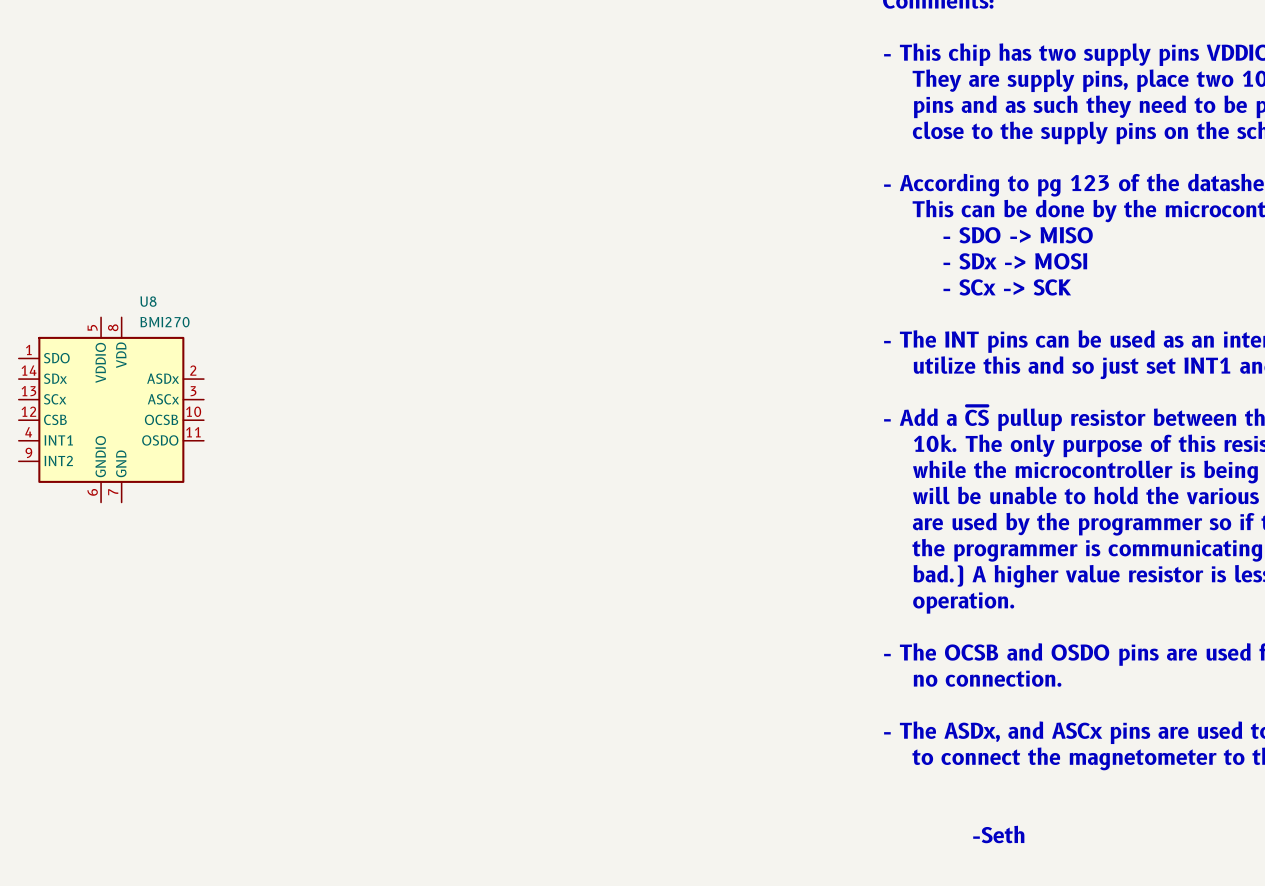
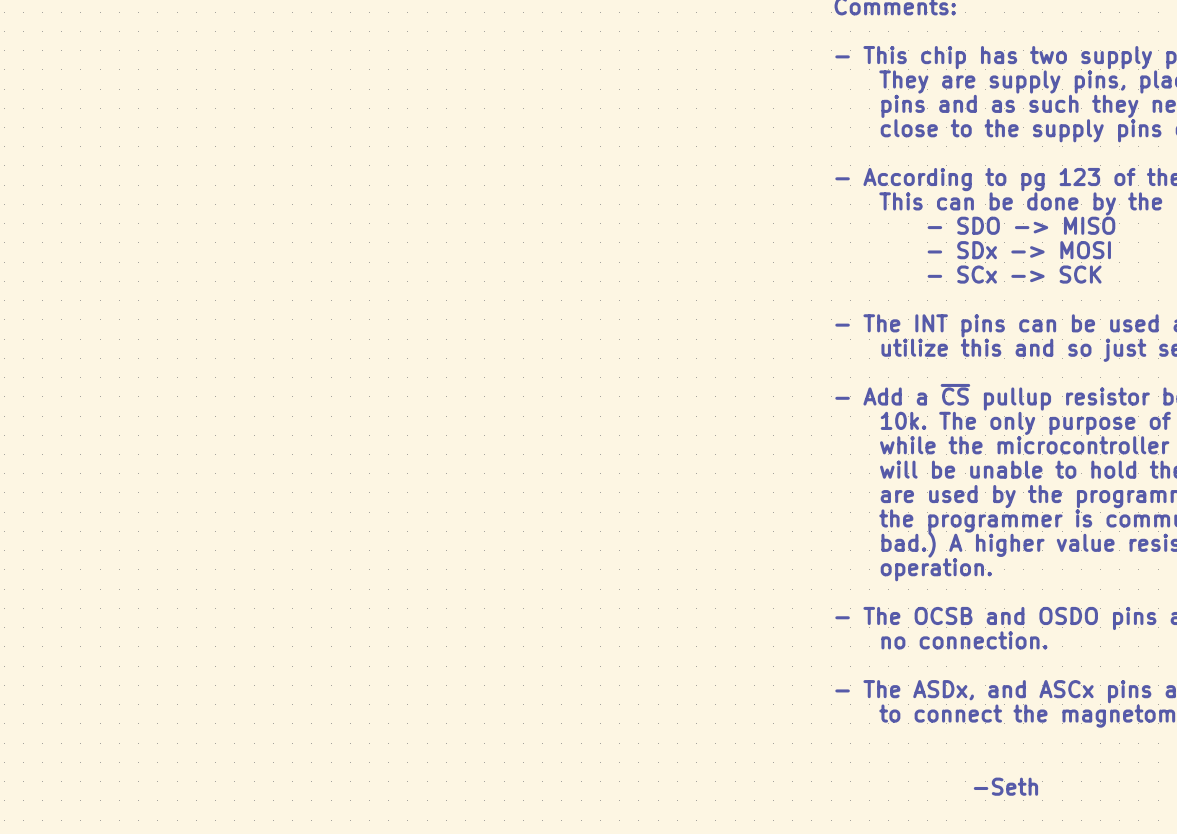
U8: BMI270 (111, 409) -> none

